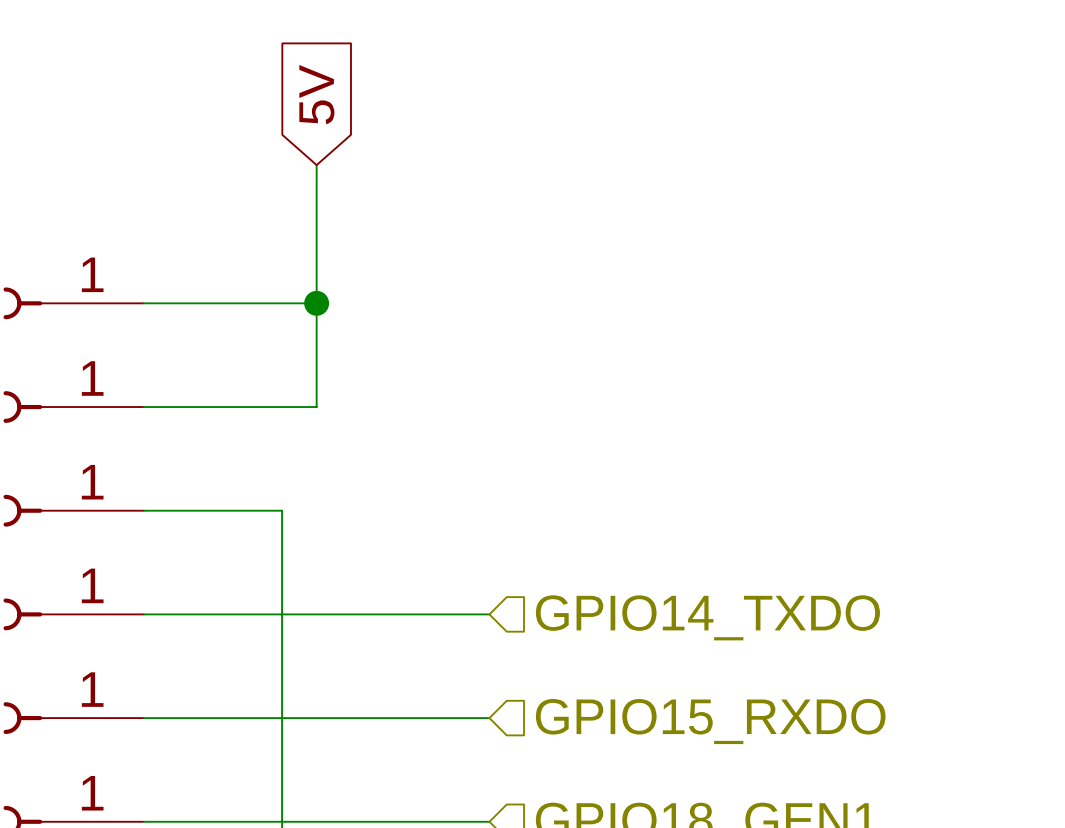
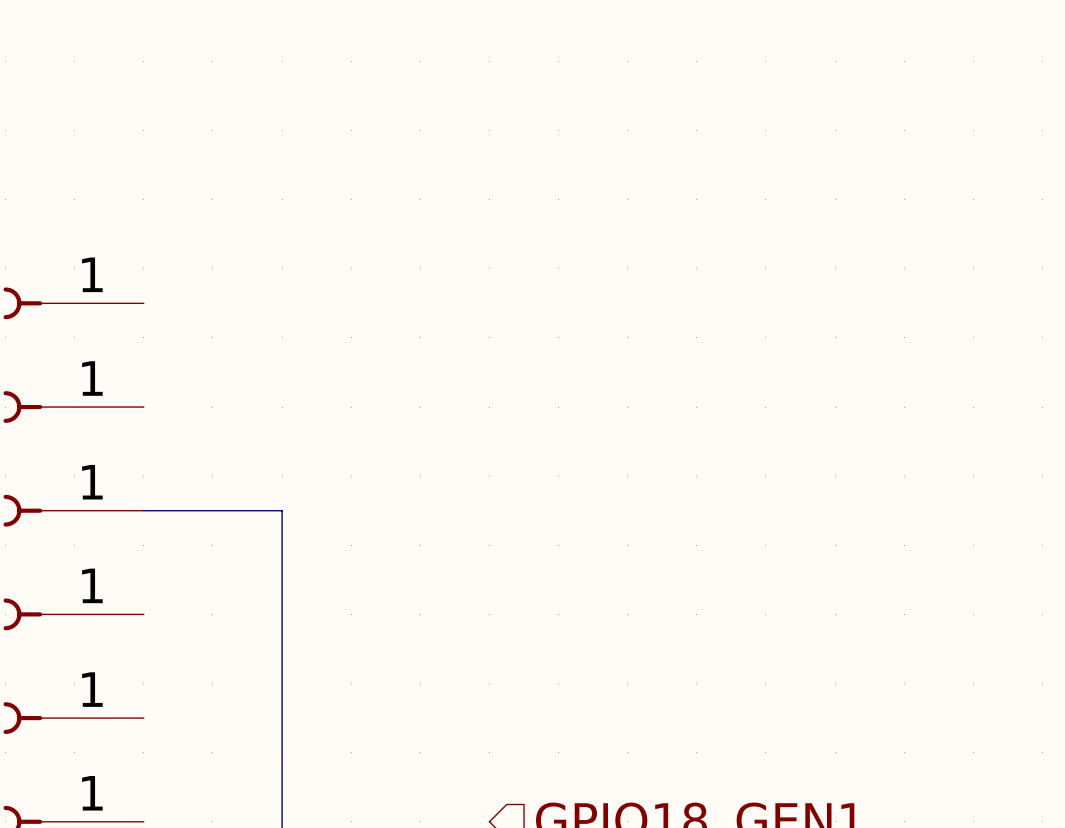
global label: 5V (316, 94) -> none
wire: (316, 165) (316, 407) (143, 407) -> none
wire: (143, 303) (316, 303) -> none
junction: (316, 303) -> none
wire: (143, 614) (489, 614) -> none
hierarchical label: GPIO14_TXDO (707, 617) -> none
wire: (143, 718) (489, 718) -> none
hierarchical label: GPIO15_RXDO (710, 721) -> none
wire: (143, 821) (489, 821) -> none

